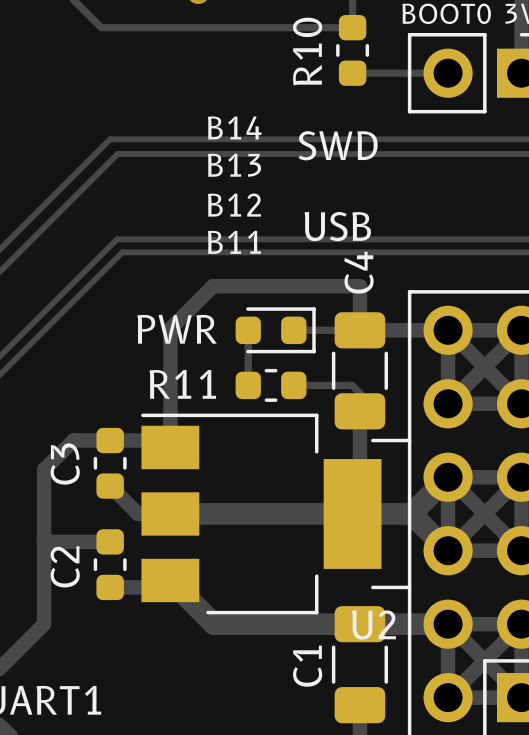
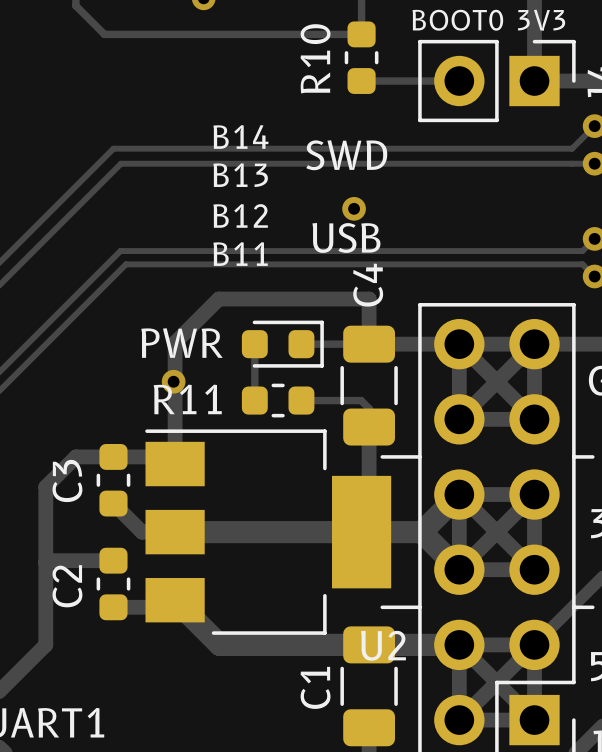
via: none -> (354, 208)
via: none -> (173, 381)

